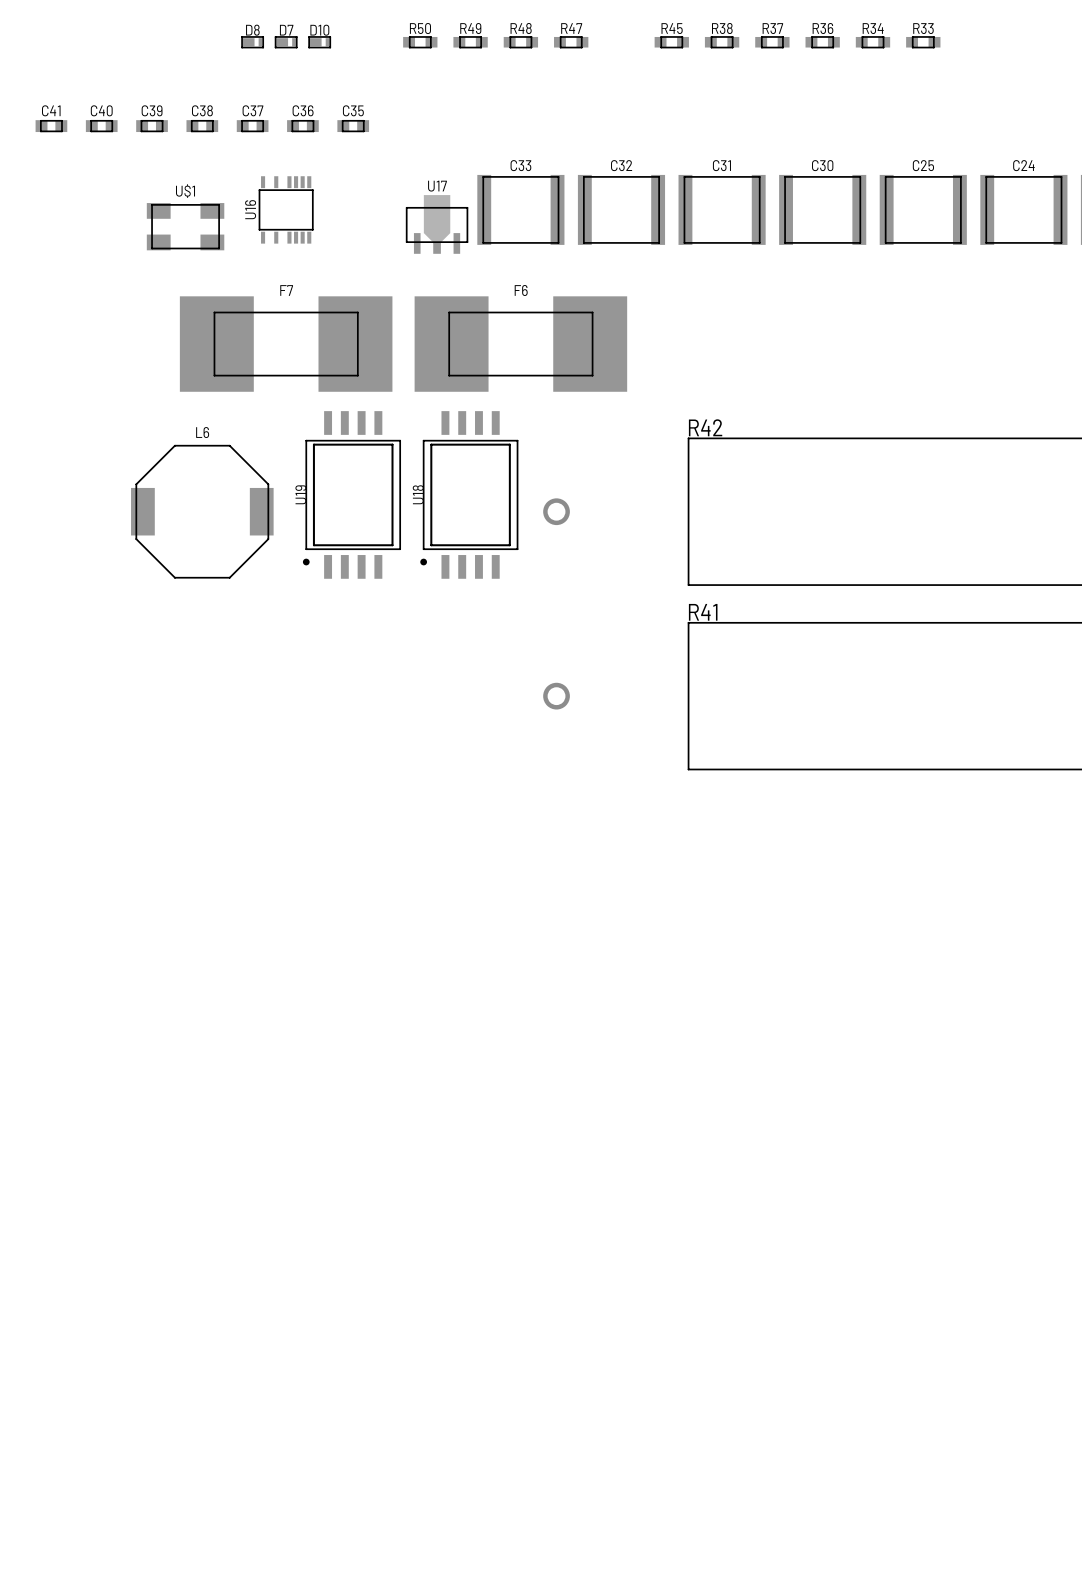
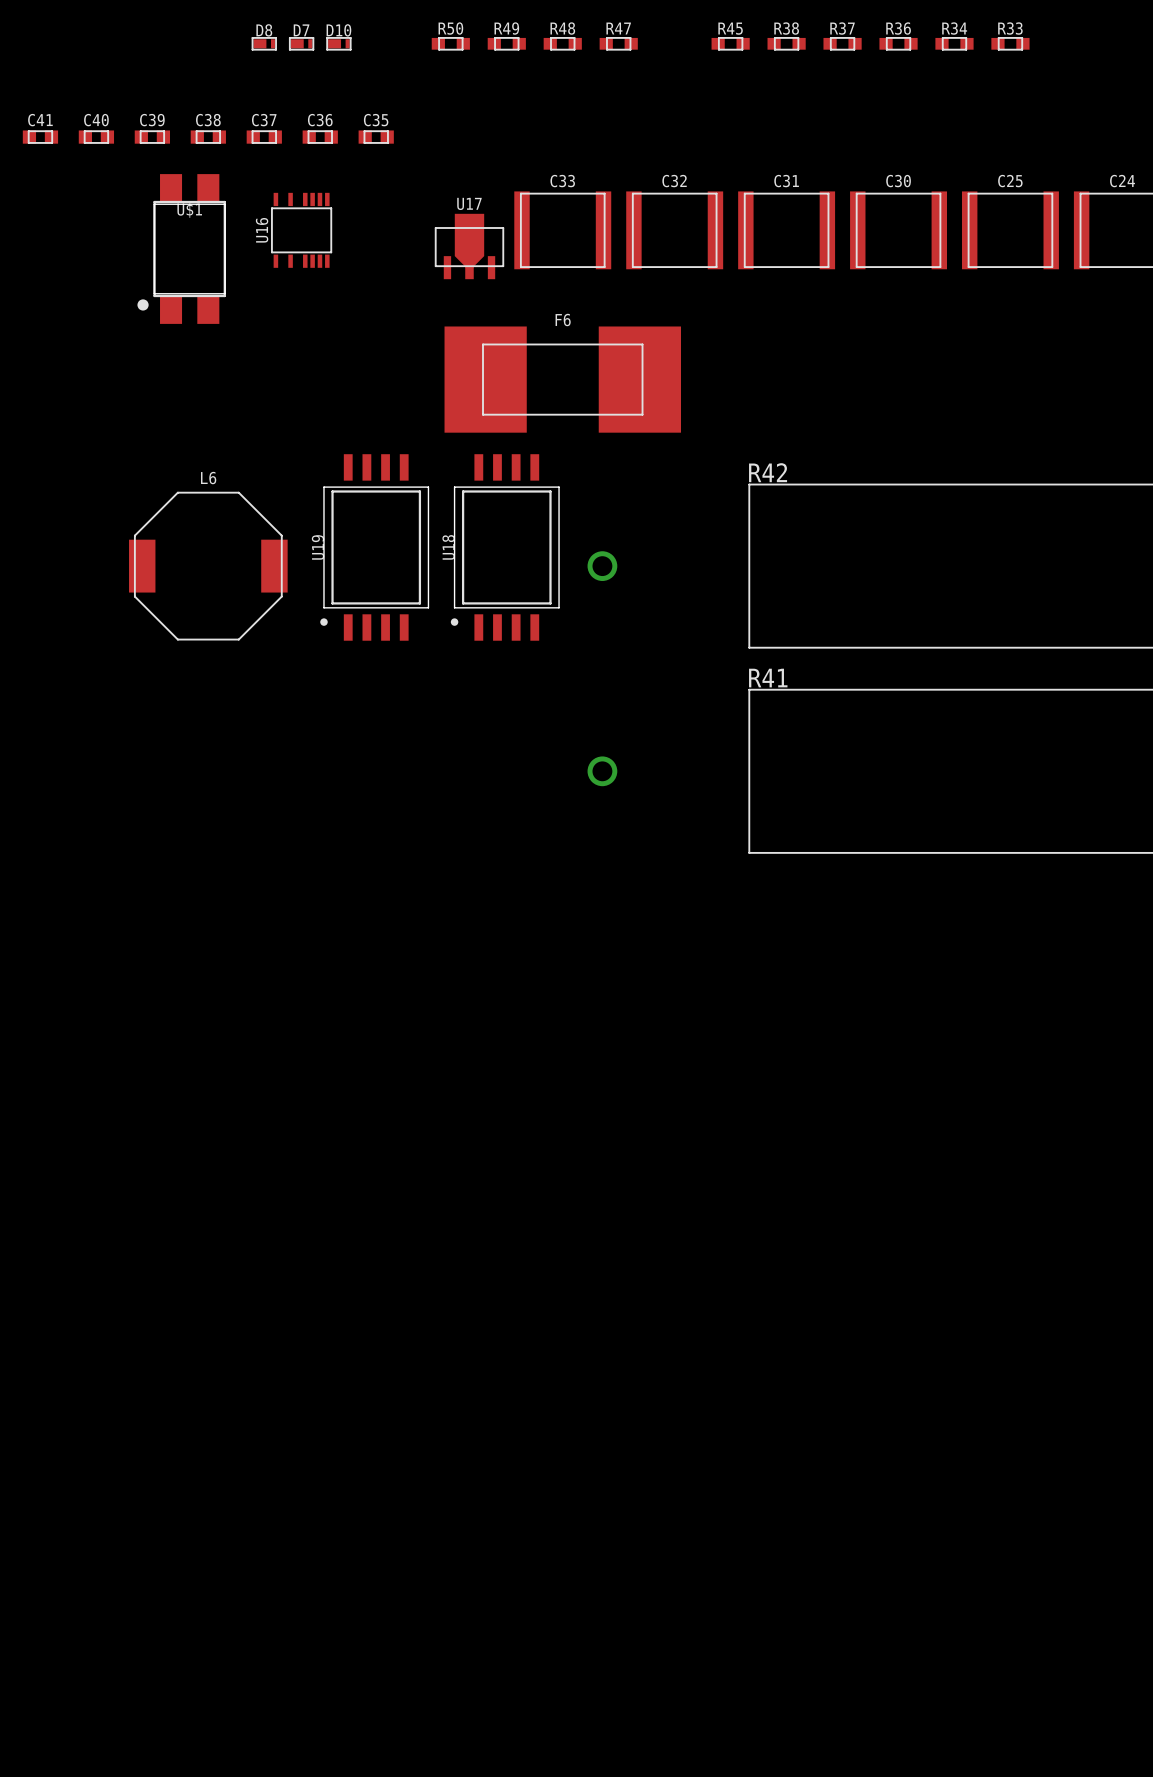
U$1 footprint: [146, 203, 225, 251] -> [137, 174, 226, 324]
F7: (286, 344) -> none

